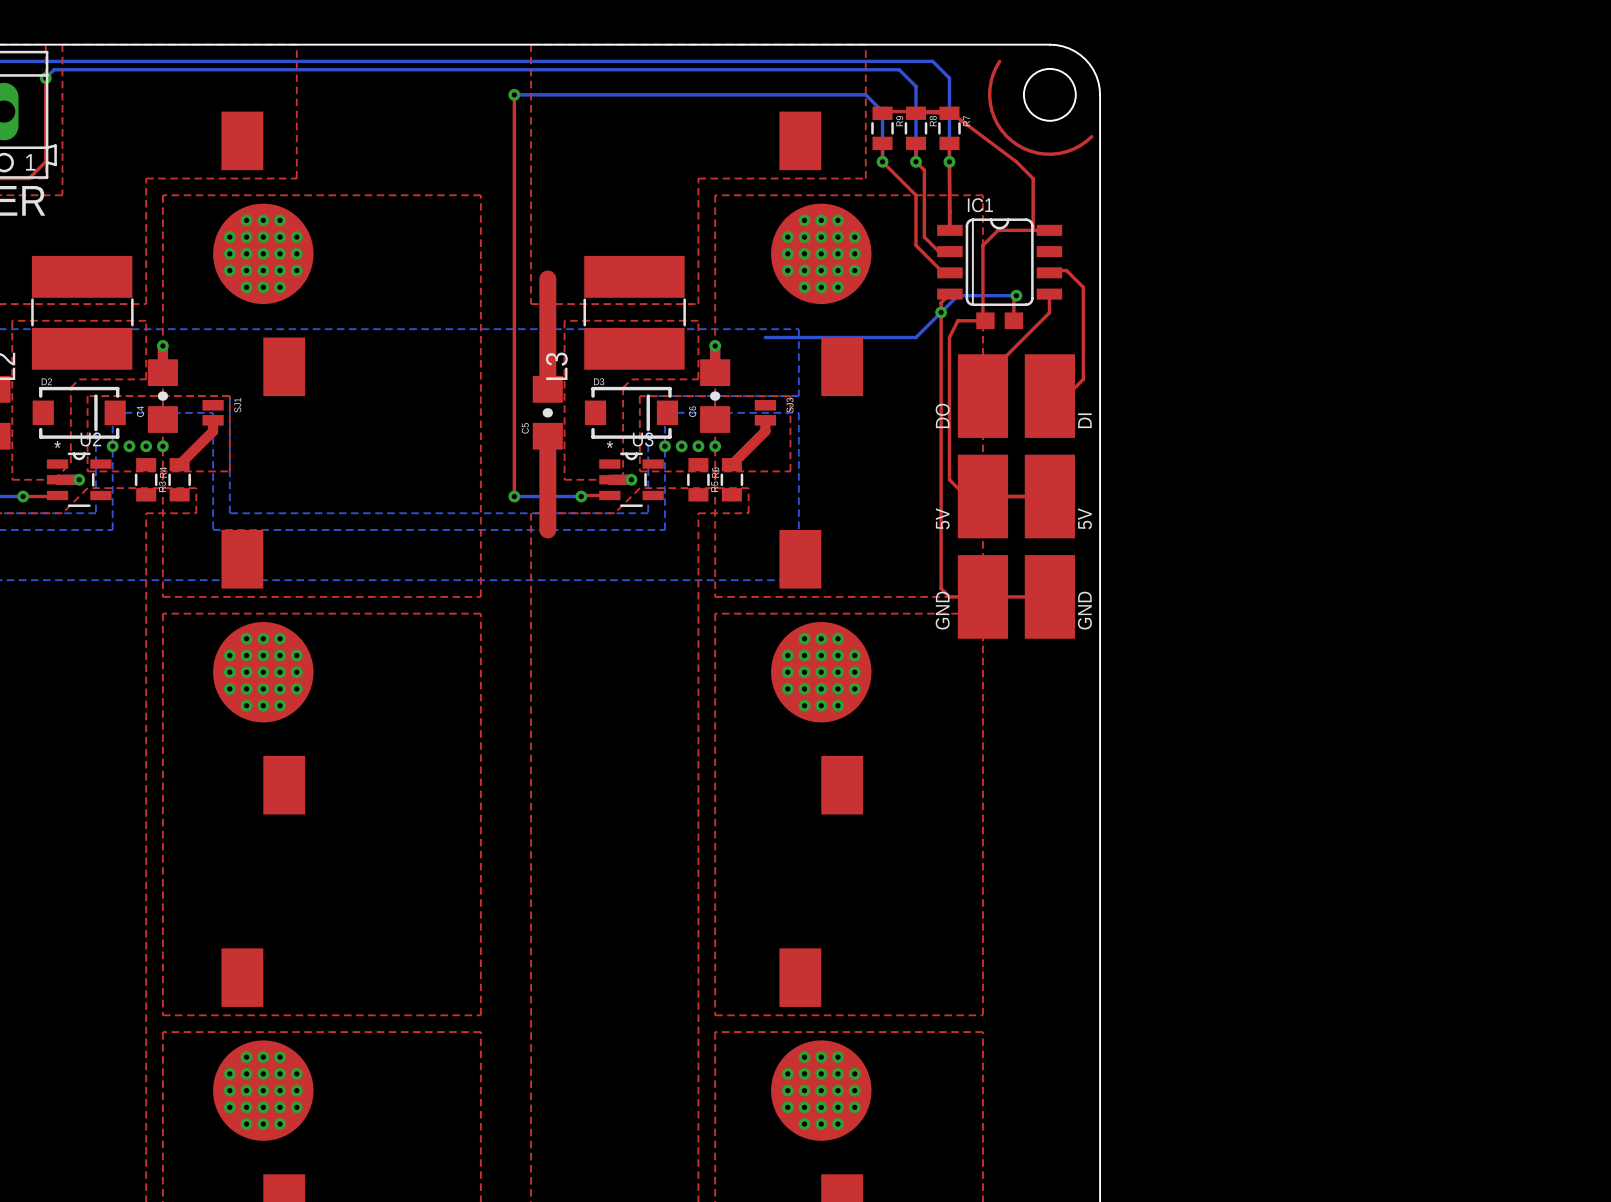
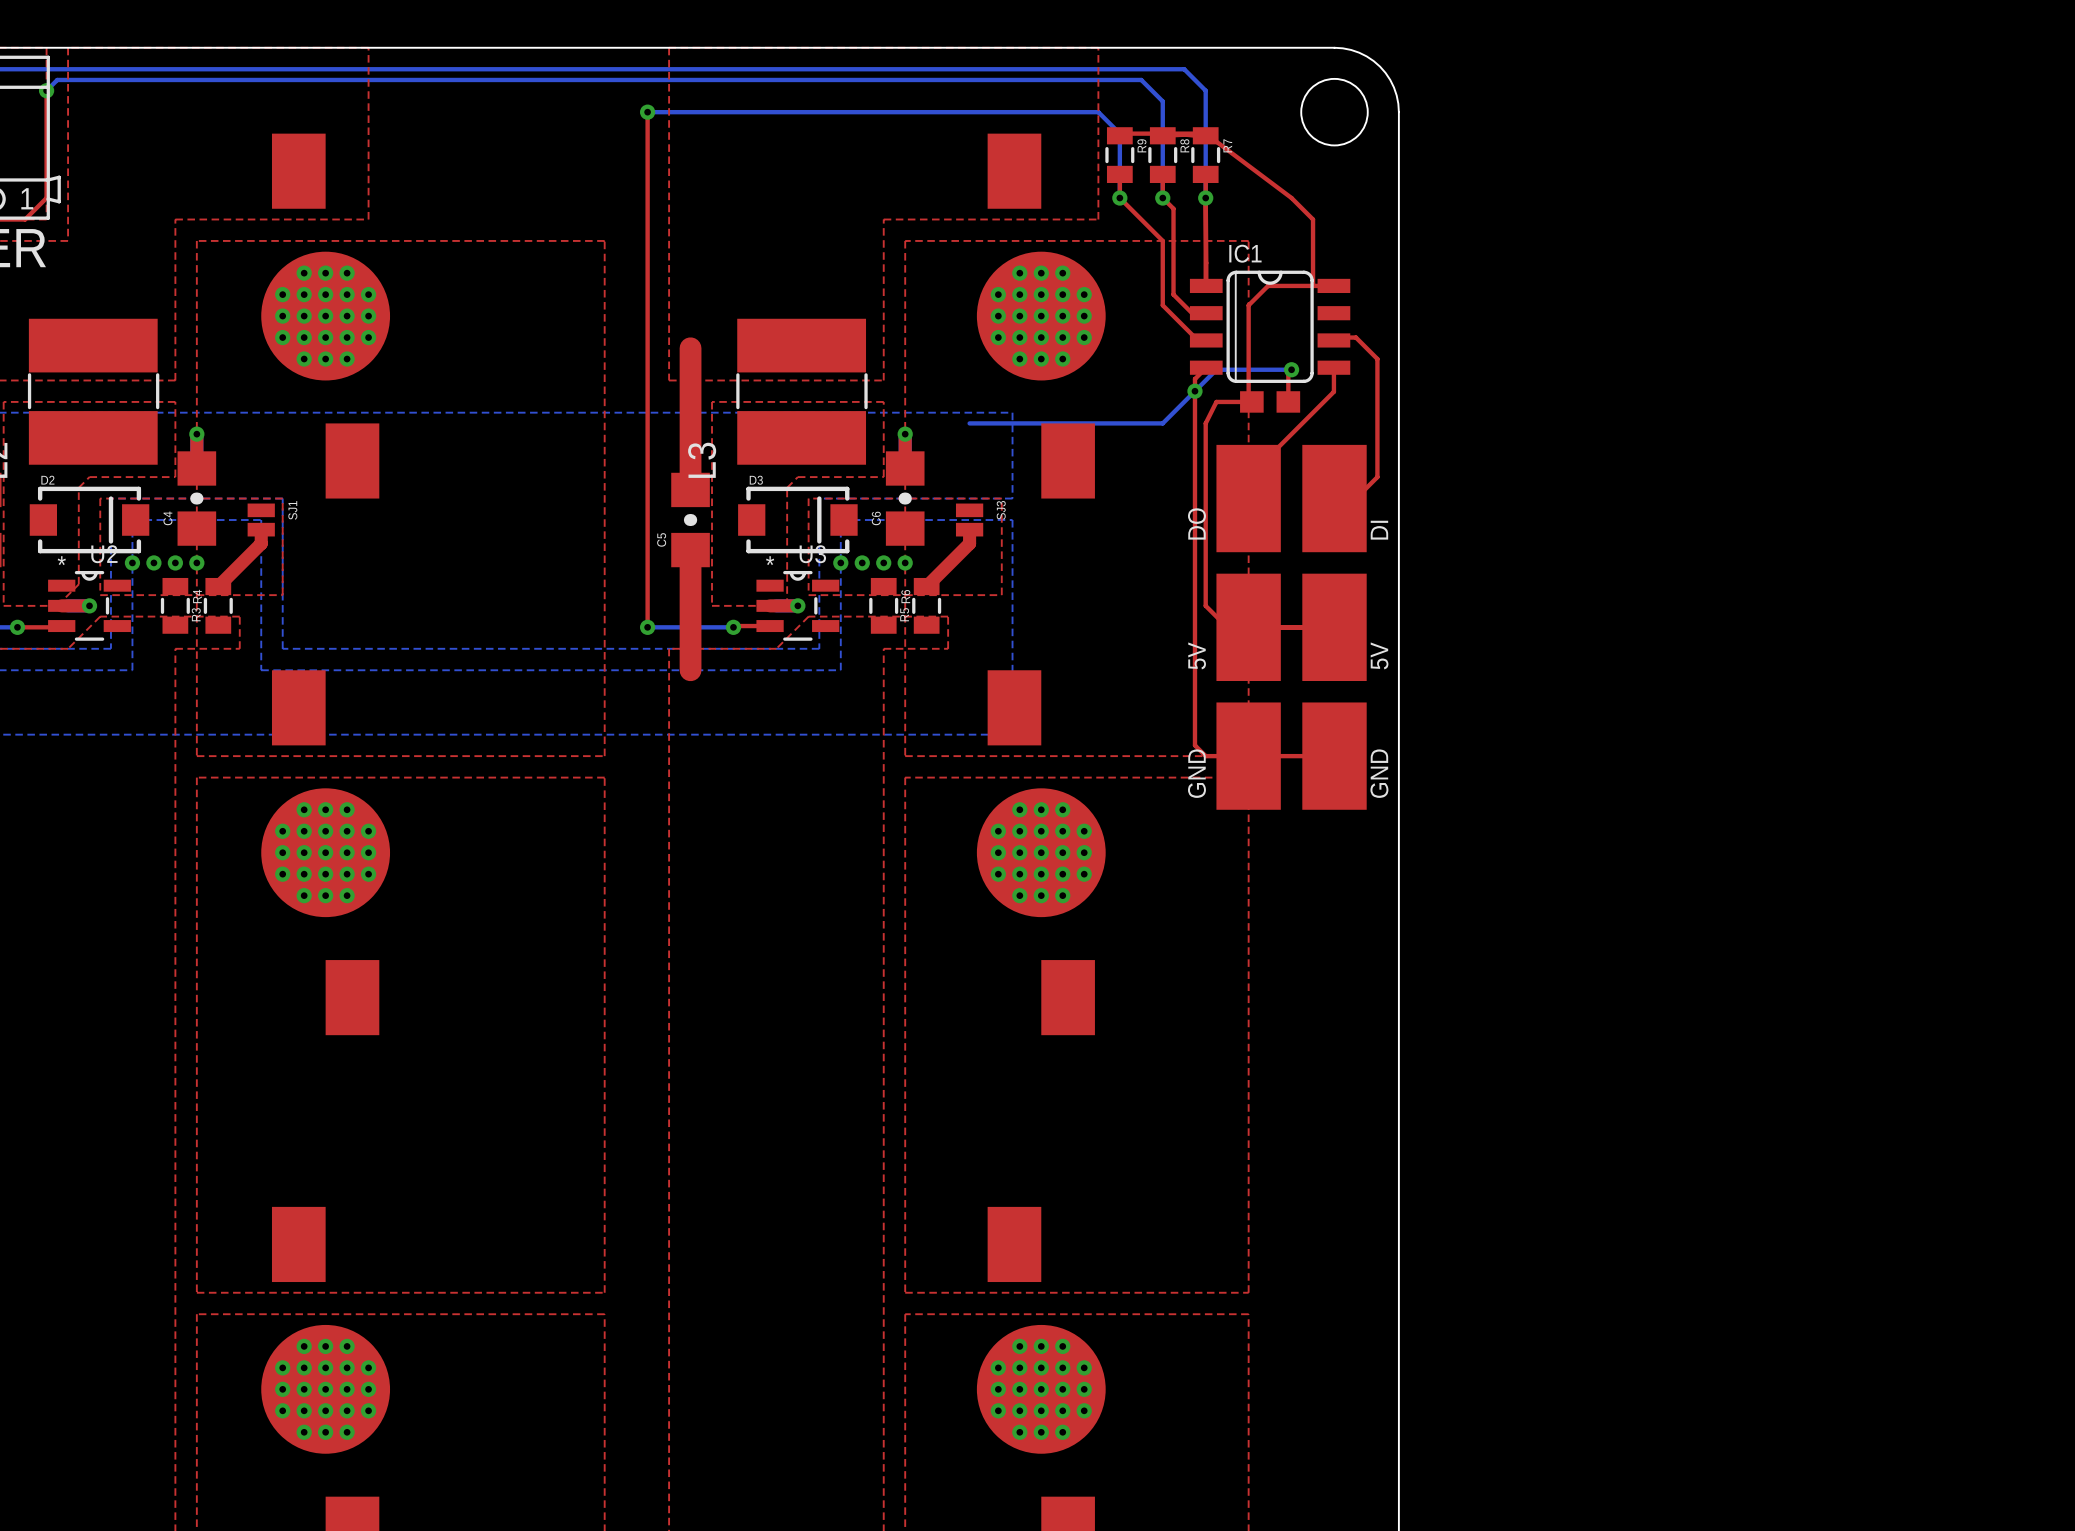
top track: (999, 61) (991, 81) (990, 103) (997, 124) (1011, 140) (1030, 151) (1052, 154) (1073, 149) (1091, 136) -> none

